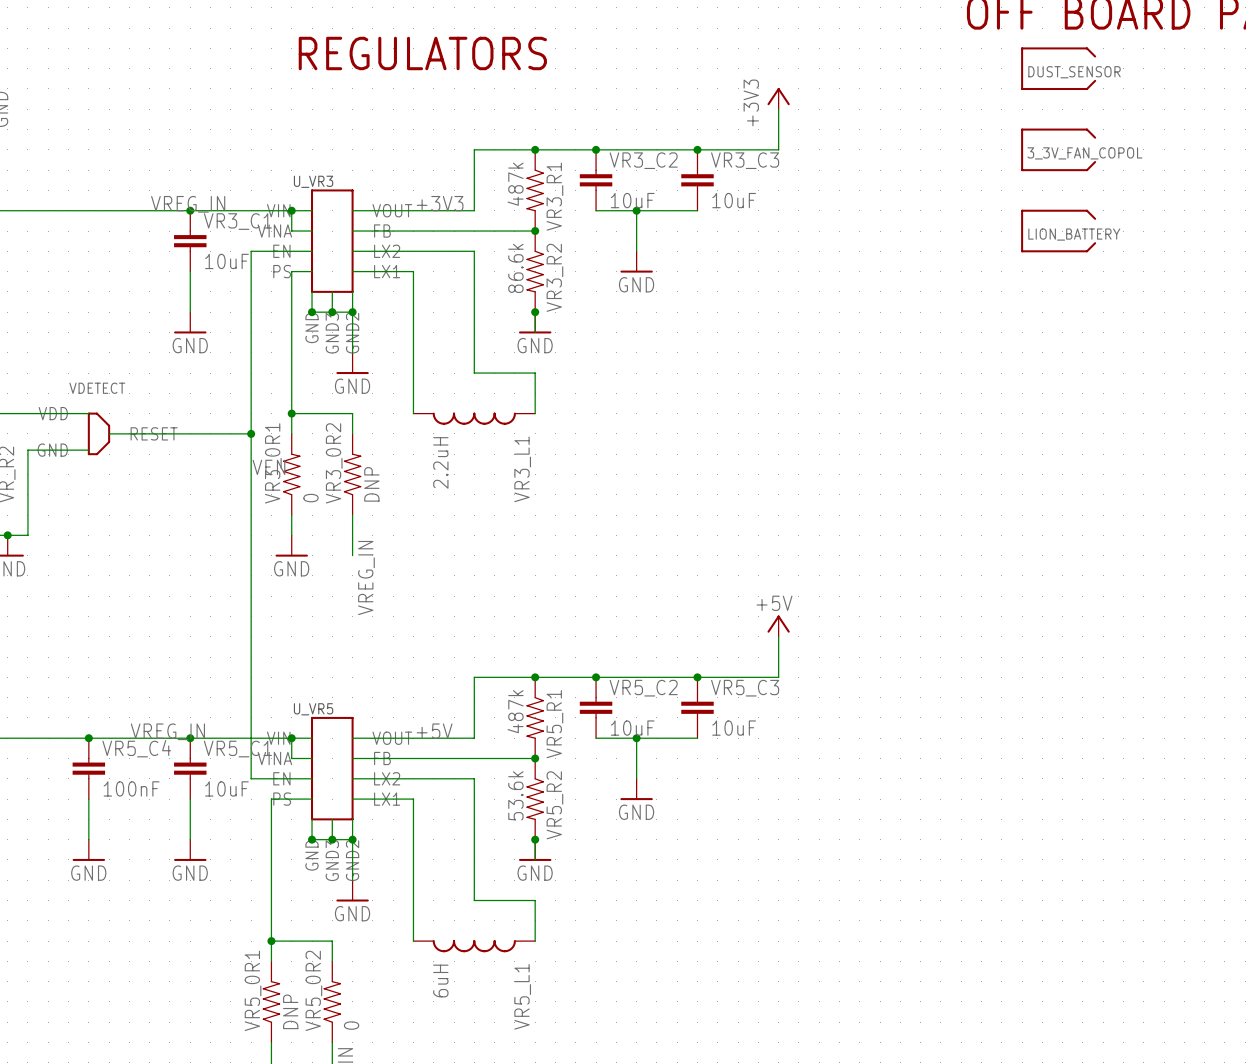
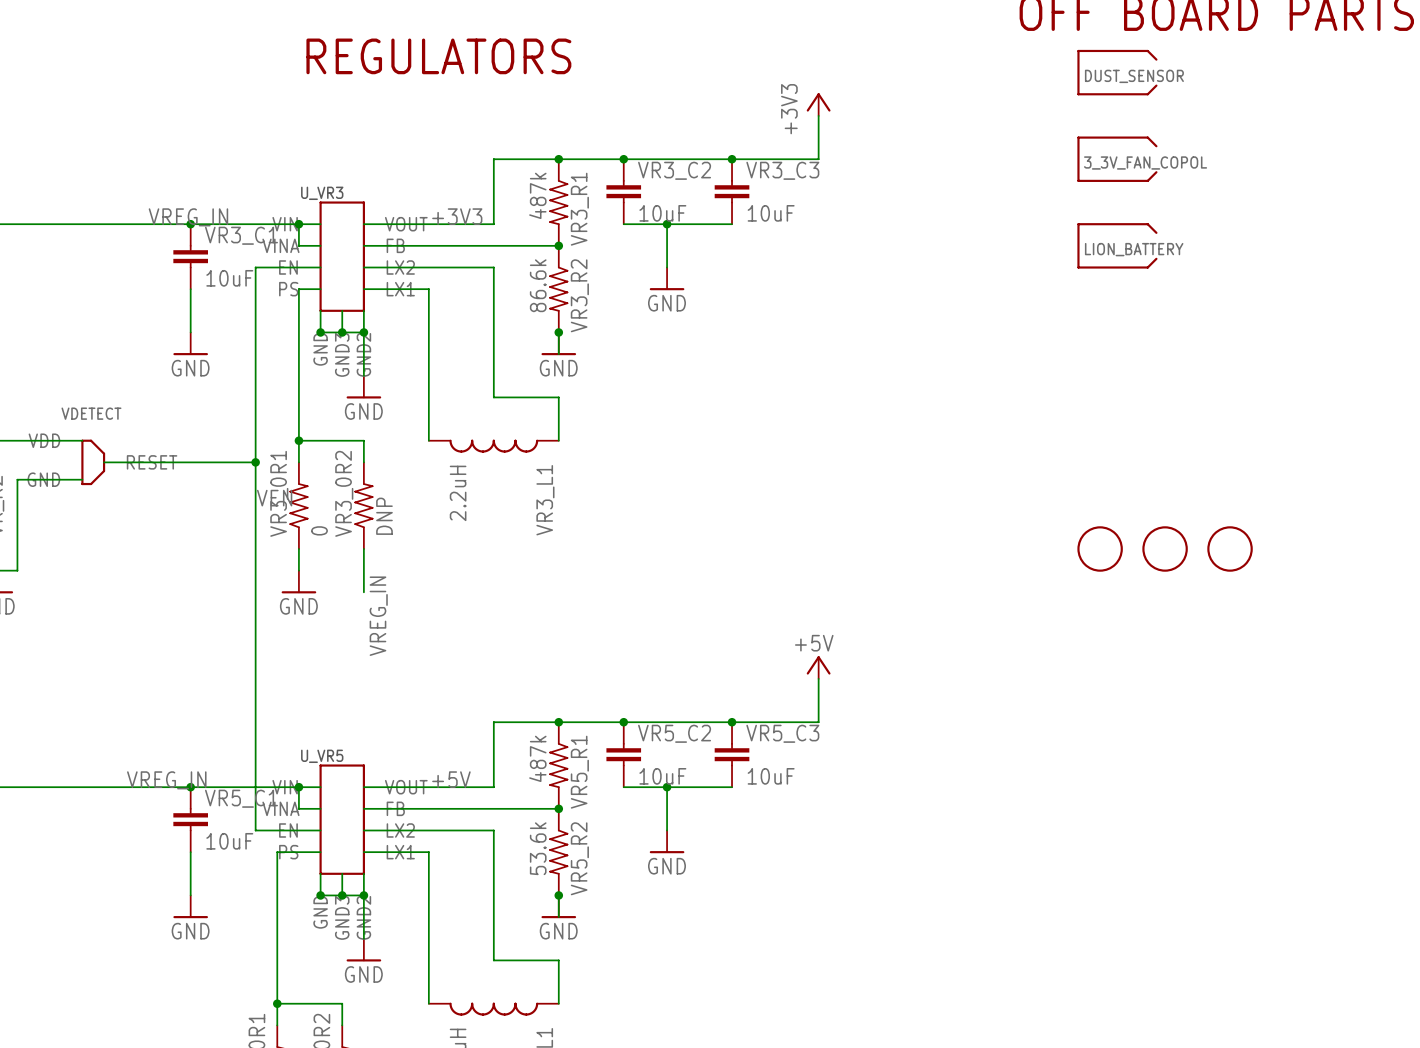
part: none -> (1100, 549)
part: none -> (1165, 549)
part: none -> (1230, 549)
junction: (88, 738) -> none
VR5_C4: 100nF (88, 768) -> none
wire: (88, 799) (88, 839) -> none
power symbol: GND (88, 850) -> none

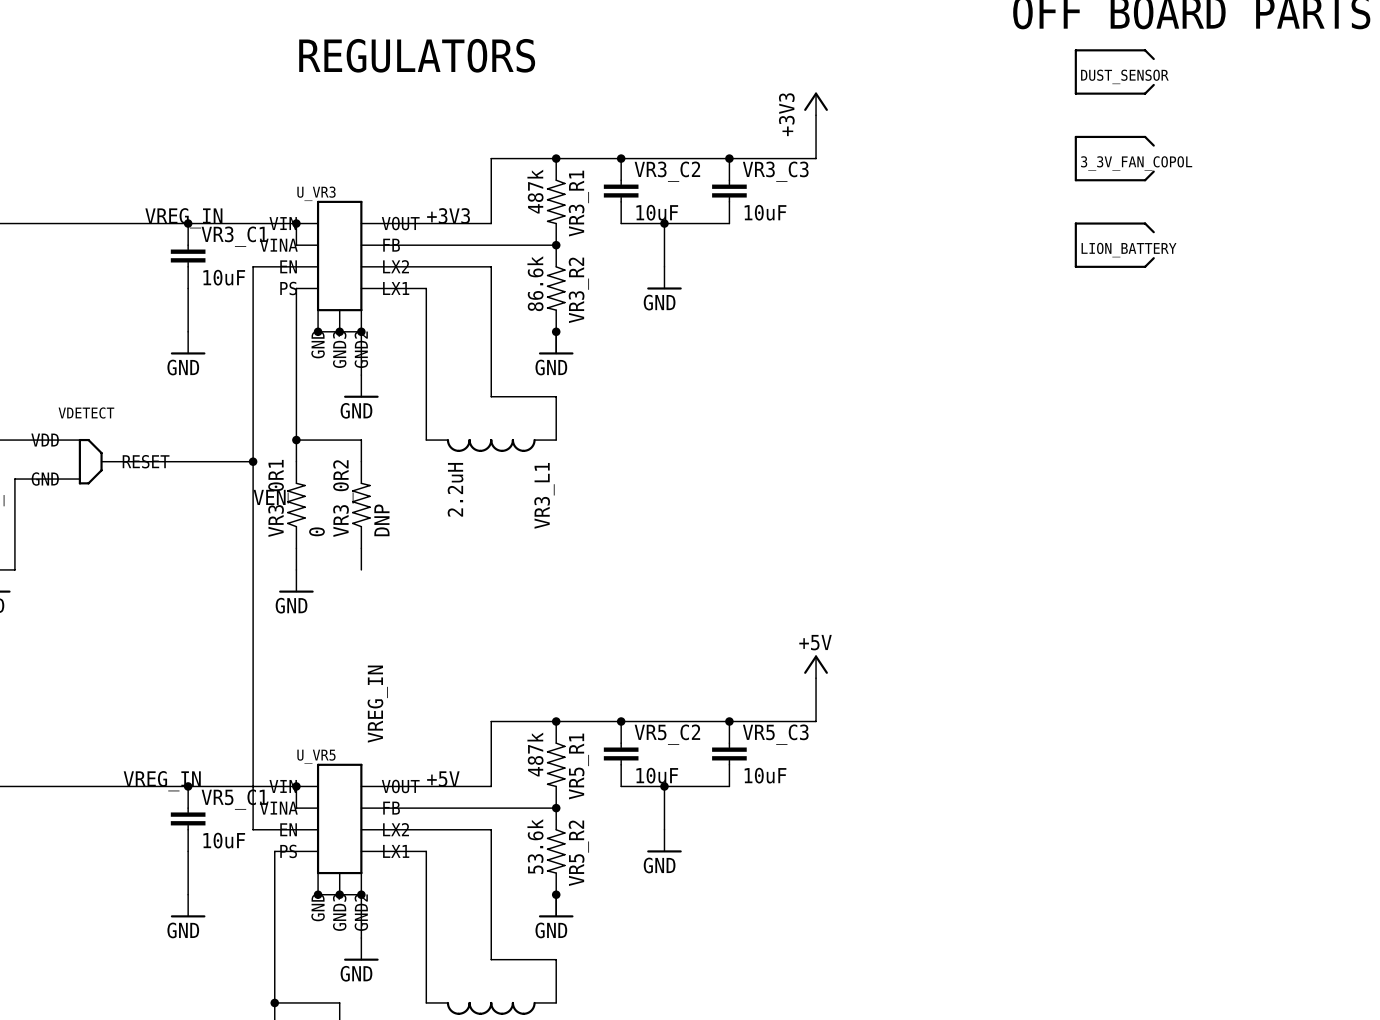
part: (1100, 549) -> none
part: (1165, 549) -> none
part: (1230, 549) -> none
wire: (363, 570) (363, 592) -> none
label position: VREG_IN (378, 616) -> VREG_IN (377, 704)

